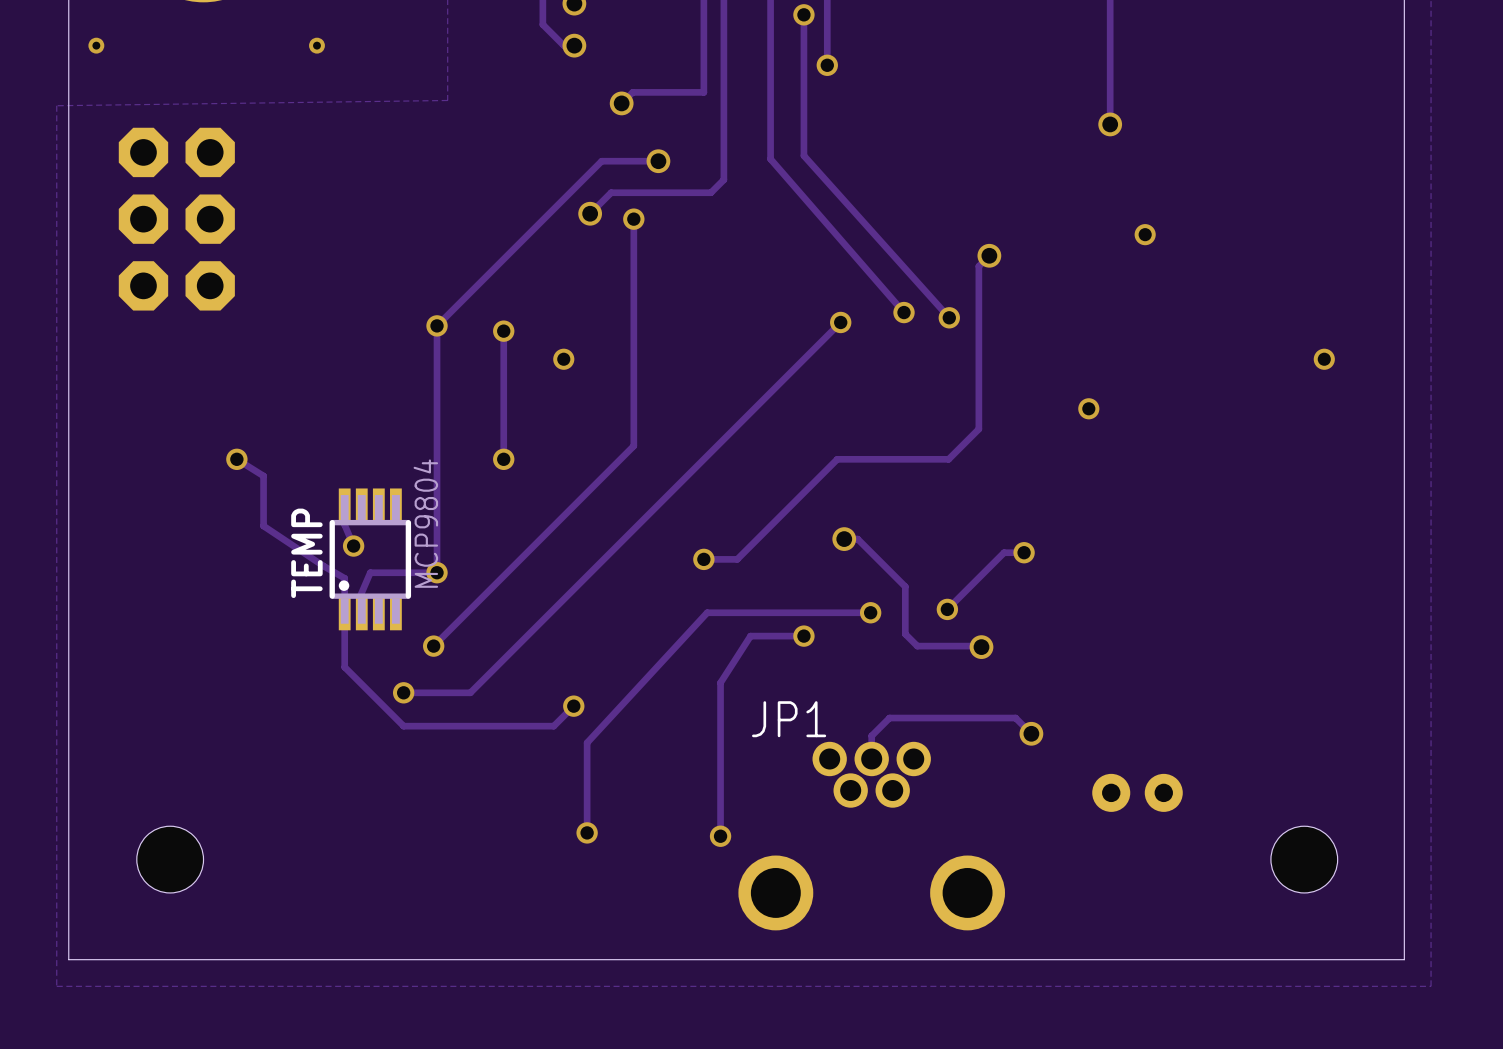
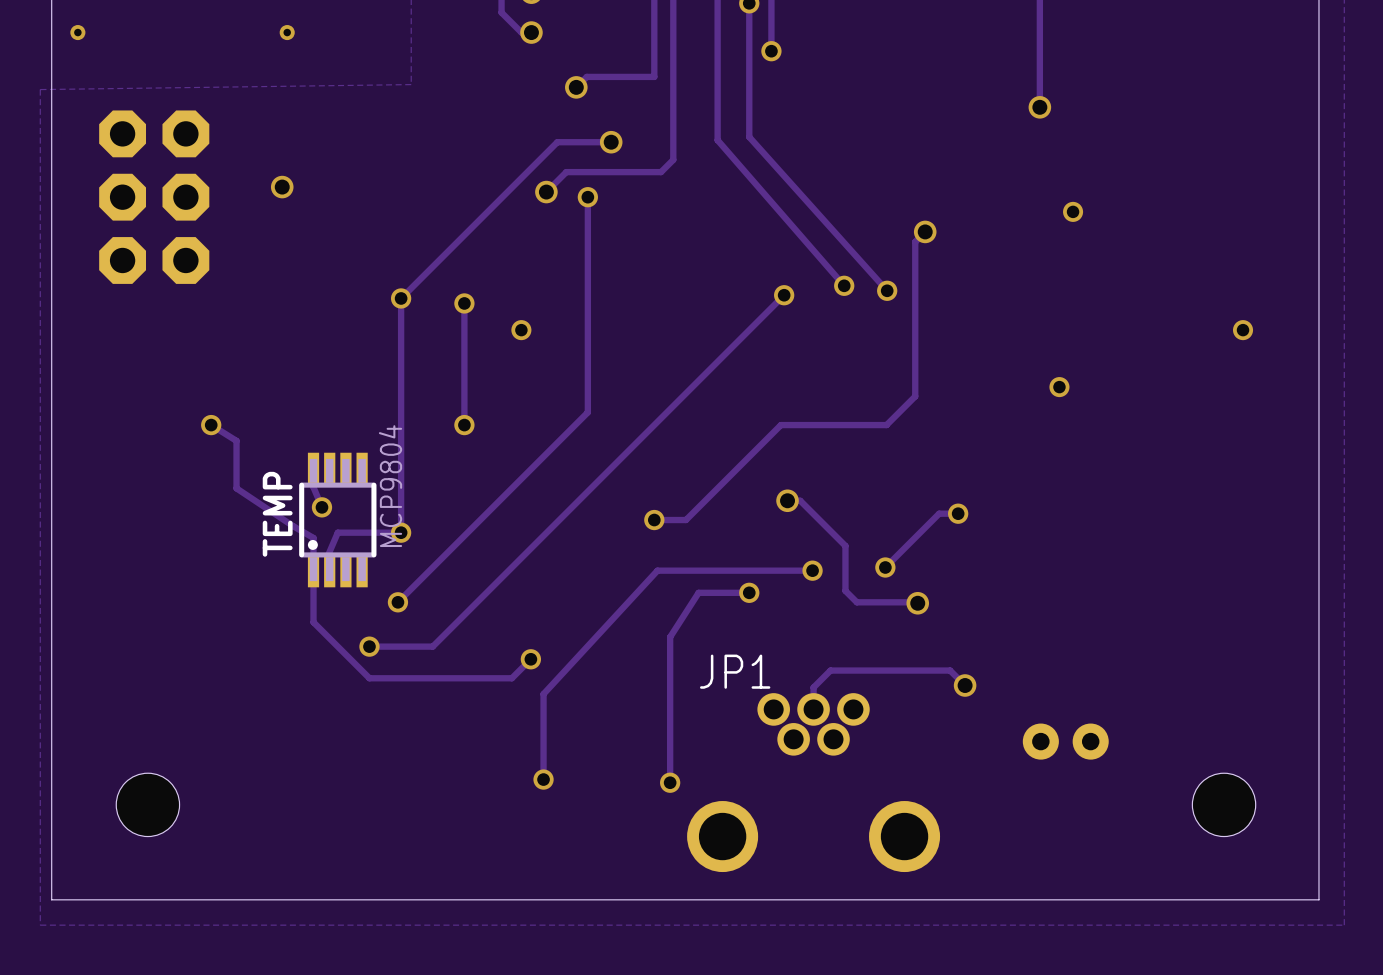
via: none -> (282, 187)
via position: (1088, 408) -> (1059, 387)

